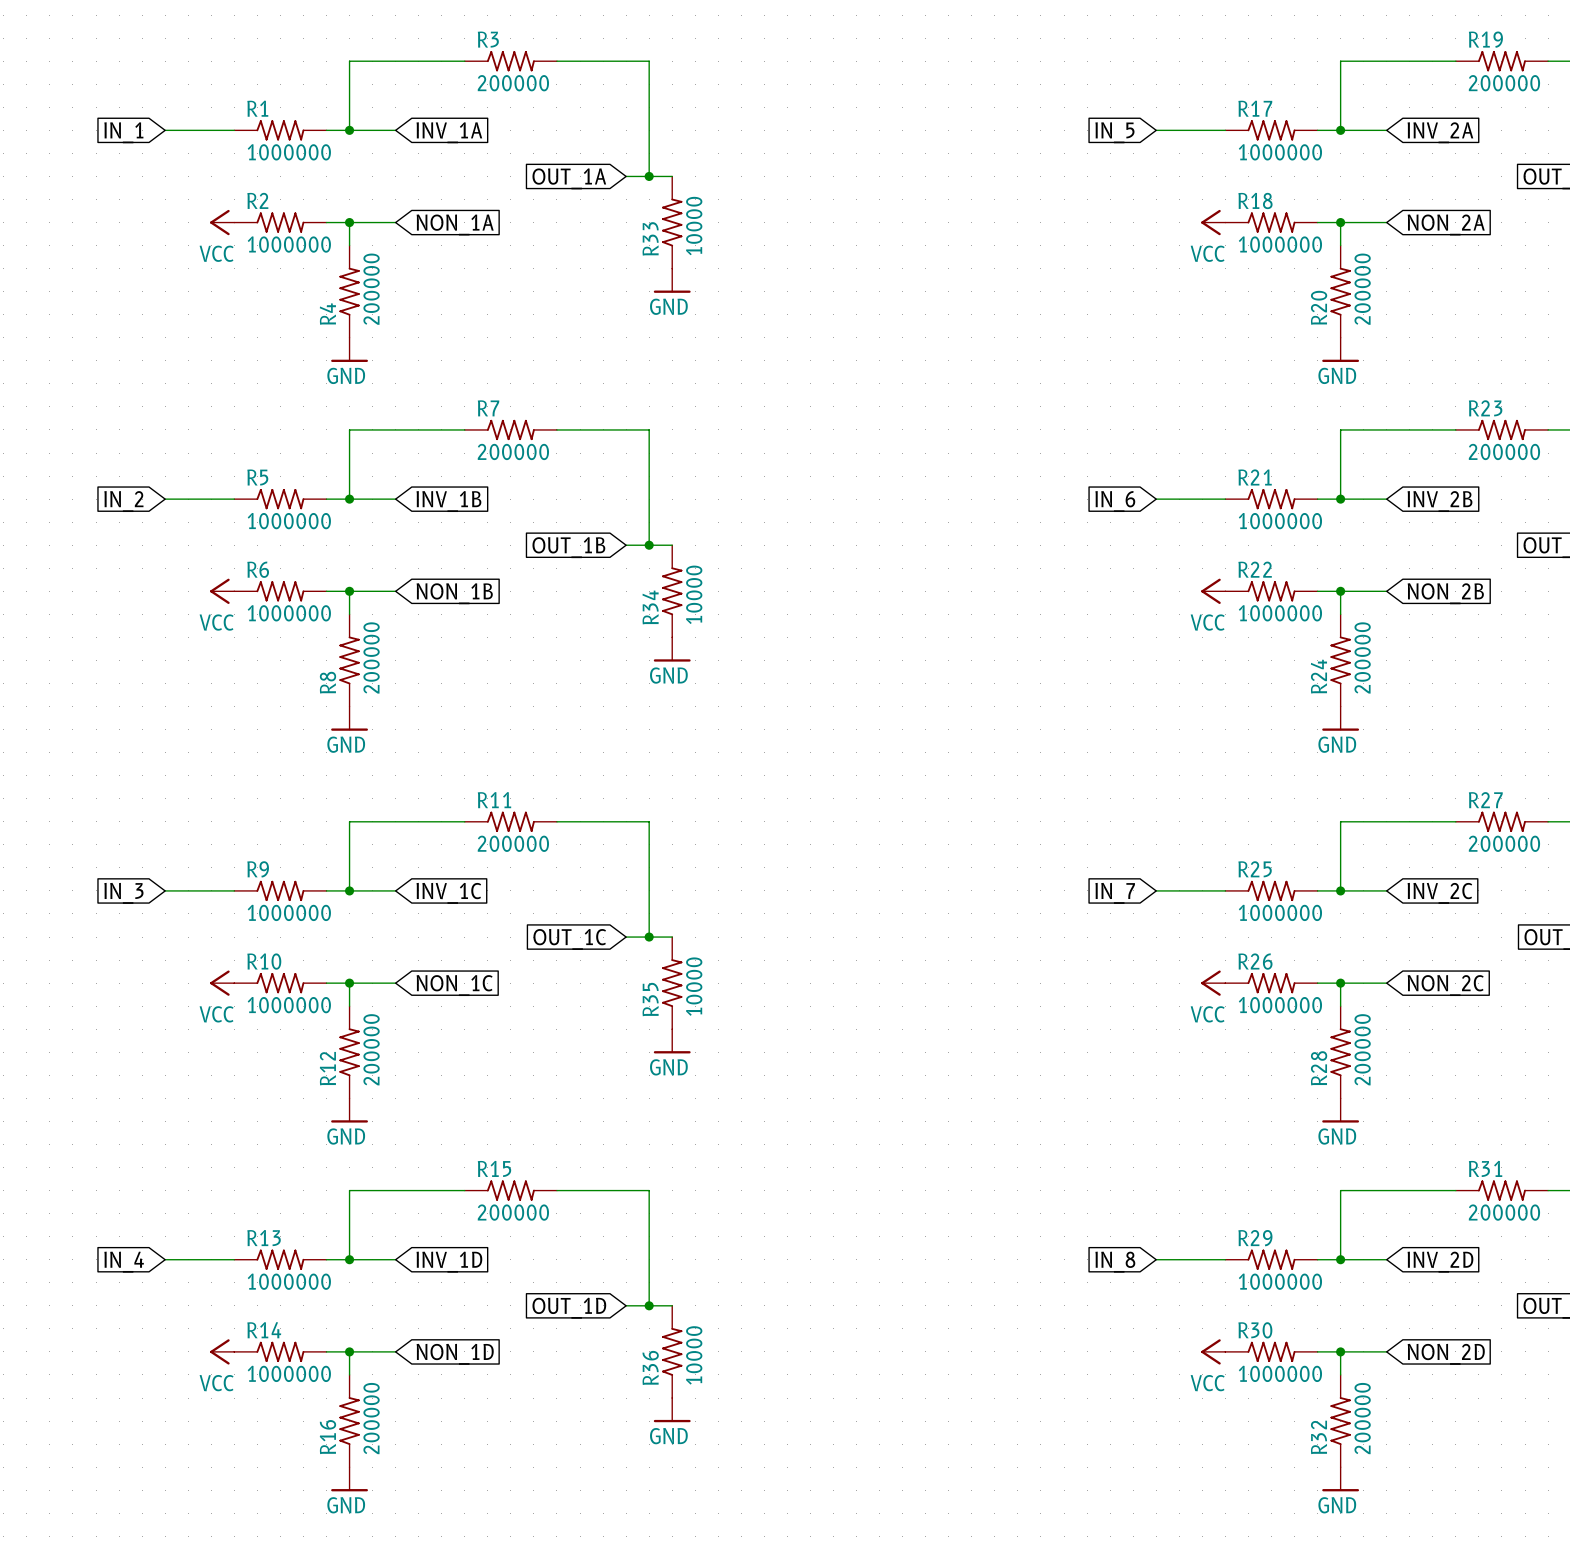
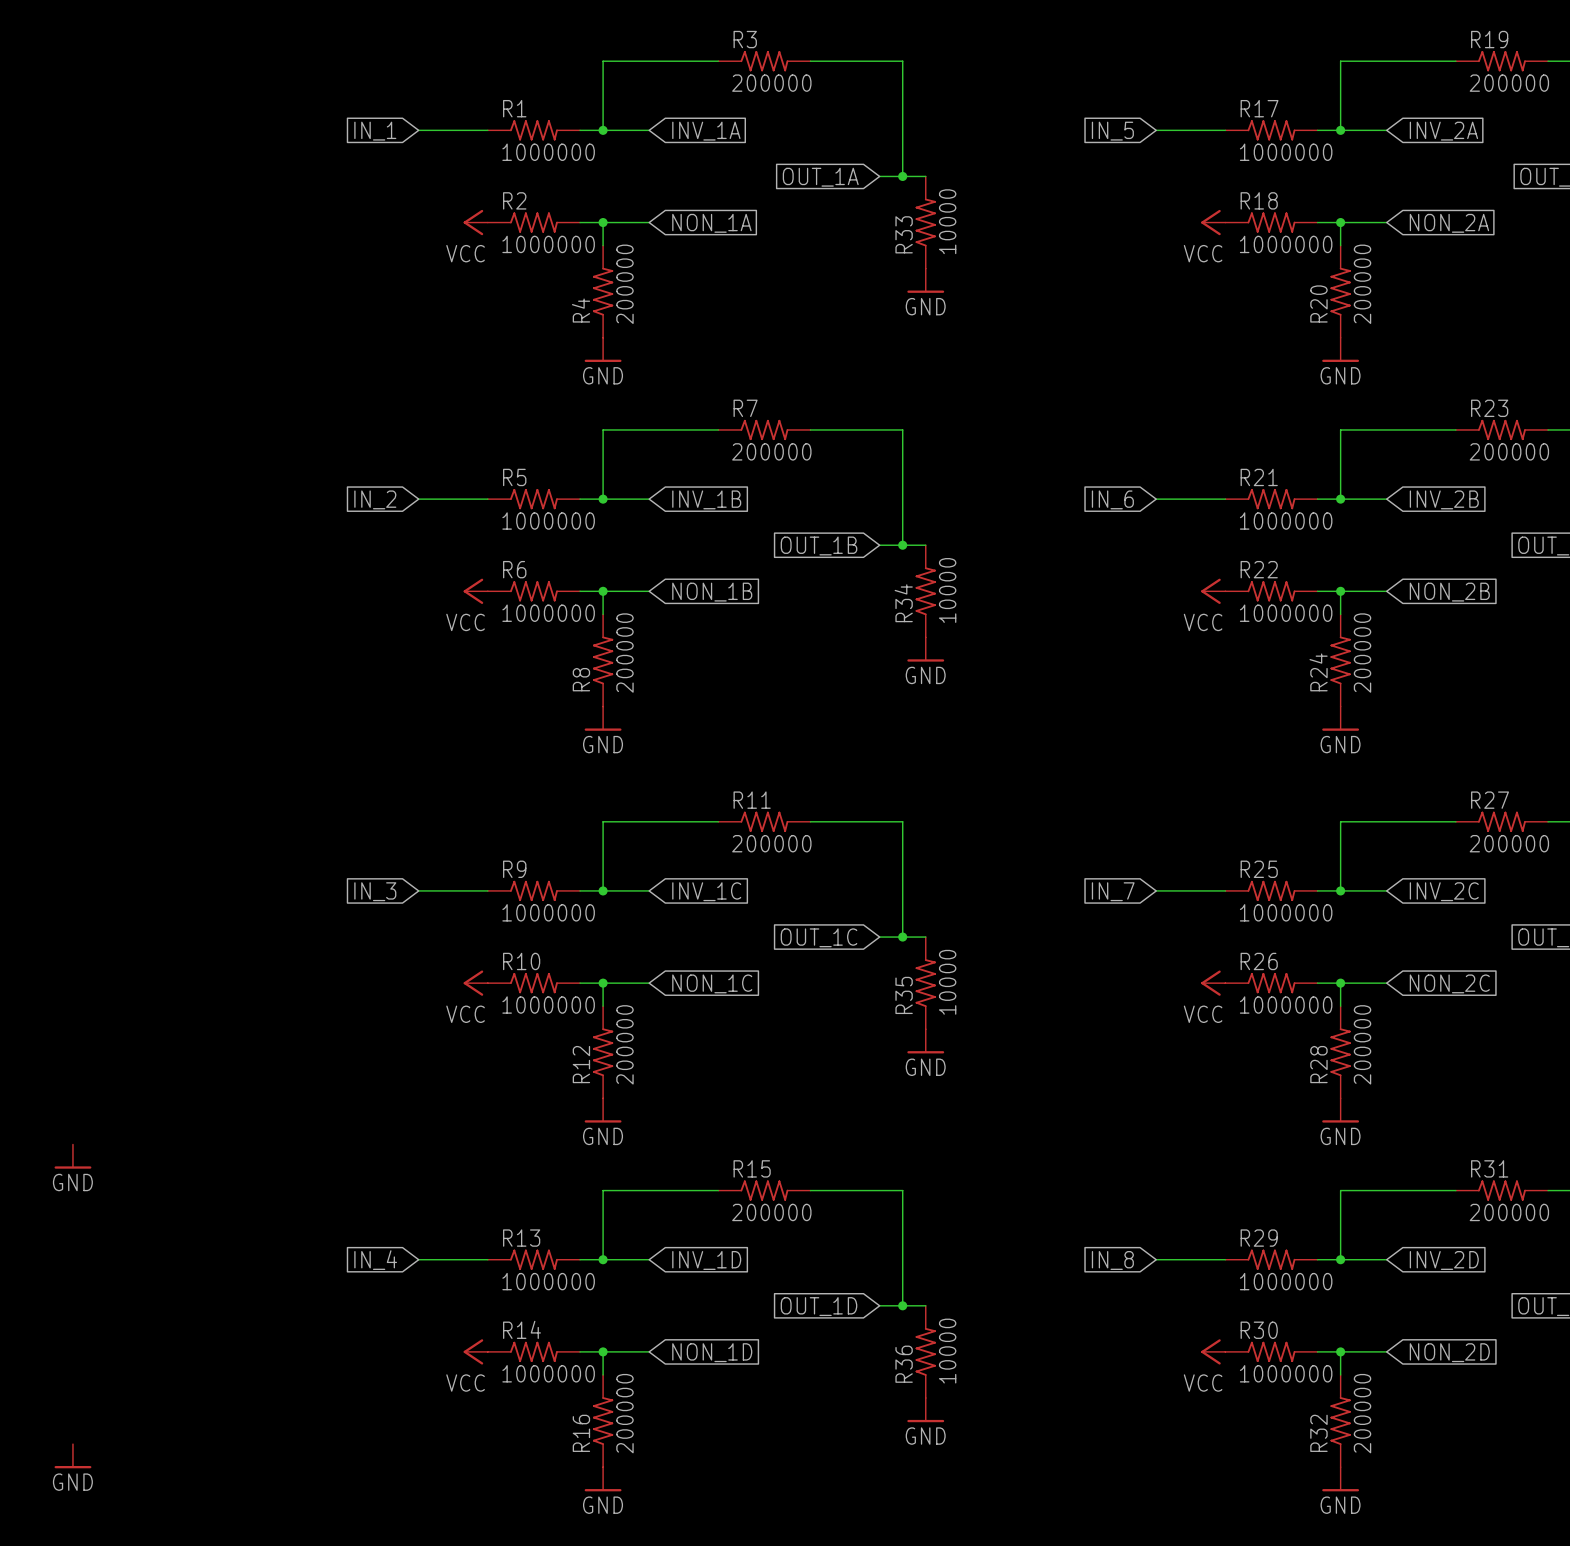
wire: (464, 61) (349, 61) (349, 130) -> none
R3 position: (510, 61) -> (764, 61)
wire: (556, 61) (603, 61) -> (603, 130) (603, 61)
wire: (649, 61) (649, 176) -> (649, 61) (718, 61)
wire: none -> (810, 61) (902, 61) (902, 176)
wire: (165, 130) (234, 130) -> none
R1 position: (280, 130) -> (533, 130)
wire: (326, 130) (395, 130) -> (418, 130) (487, 130)
junction: (349, 130) -> none
wire: none -> (580, 130) (649, 130)
junction: none -> (603, 130)
global label: IN_1 (123, 132) -> none
global label: INV_1A (449, 132) -> IN_1 (375, 131)
global label: none -> INV_1A (706, 131)
wire: (626, 176) (672, 176) -> none
junction: (649, 176) -> none
wire: none -> (879, 176) (925, 176)
junction: none -> (902, 176)
global label: OUT_1A (569, 178) -> none
global label: none -> OUT_1A (820, 177)
power symbol: VCC (222, 222) -> none
R2 position: (280, 222) -> (533, 222)
wire: (326, 222) (395, 222) -> none
wire: (349, 222) (349, 245) -> none
junction: (349, 222) -> none
power symbol: none -> VCC (475, 222)
wire: none -> (580, 222) (649, 222)
wire: none -> (603, 222) (603, 245)
junction: none -> (603, 222)
R33 position: (672, 222) -> (925, 222)
global label: NON_1A (455, 224) -> none
global label: none -> NON_1A (711, 223)
power symbol position: GND (672, 280) -> GND (603, 349)
power symbol: none -> GND (925, 280)
R4 position: (349, 291) -> (603, 291)
power symbol: GND (349, 349) -> none
wire: (464, 429) (349, 429) (349, 499) -> none
R7 position: (510, 429) -> (764, 429)
wire: (556, 429) (603, 429) -> (603, 499) (603, 429)
wire: (649, 429) (649, 545) -> (649, 429) (718, 429)
wire: none -> (810, 429) (902, 429) (902, 545)
wire: (165, 499) (234, 499) -> none
R5 position: (280, 499) -> (533, 499)
wire: (326, 499) (395, 499) -> (418, 499) (487, 499)
junction: (349, 499) -> none
wire: none -> (580, 499) (649, 499)
junction: none -> (603, 499)
global label: IN_2 (123, 501) -> none
global label: none -> IN_2 (375, 499)
global label: INV_1B (448, 501) -> none
global label: none -> INV_1B (706, 499)
wire: (626, 545) (672, 545) -> none
junction: (649, 545) -> none
wire: none -> (879, 545) (925, 545)
junction: none -> (902, 545)
global label: OUT_1B (568, 547) -> none
global label: none -> OUT_1B (819, 545)
power symbol: VCC (222, 591) -> none
R6 position: (280, 591) -> (533, 591)
wire: (326, 591) (395, 591) -> none
wire: (349, 591) (349, 614) -> none
junction: (349, 591) -> none
power symbol: none -> VCC (475, 591)
wire: none -> (580, 591) (649, 591)
wire: none -> (603, 591) (603, 614)
junction: none -> (603, 591)
R34 position: (672, 591) -> (925, 591)
global label: NON_1B (454, 593) -> none
global label: none -> NON_1B (712, 592)
power symbol position: GND (672, 649) -> GND (603, 718)
power symbol: none -> GND (925, 649)
R8 position: (349, 660) -> (603, 660)
power symbol: GND (349, 718) -> none
wire: (464, 821) (349, 821) (349, 890) -> none
R11 position: (510, 821) -> (764, 821)
wire: (556, 821) (603, 821) -> (603, 890) (603, 821)
wire: (649, 821) (649, 937) -> (649, 821) (718, 821)
wire: none -> (810, 821) (902, 821) (902, 937)
wire: (165, 890) (234, 890) -> none
R9 position: (280, 890) -> (533, 890)
wire: (326, 890) (395, 890) -> (418, 890) (487, 890)
junction: (349, 890) -> none
wire: none -> (580, 890) (649, 890)
junction: none -> (603, 890)
global label: IN_3 (123, 893) -> none
global label: none -> IN_3 (375, 891)
global label: INV_1C (448, 893) -> none
global label: none -> INV_1C (706, 891)
wire: (626, 937) (672, 937) -> none
junction: (649, 937) -> none
wire: none -> (879, 937) (925, 937)
junction: none -> (902, 937)
global label: OUT_1C (569, 939) -> none
global label: none -> OUT_1C (819, 937)
power symbol: VCC (222, 983) -> none
R10 position: (280, 983) -> (533, 983)
wire: (326, 983) (395, 983) -> none
wire: (349, 983) (349, 1006) -> none
junction: (349, 983) -> none
power symbol: none -> VCC (475, 983)
wire: none -> (580, 983) (649, 983)
wire: none -> (603, 983) (603, 1006)
junction: none -> (603, 983)
R35 position: (672, 983) -> (925, 983)
global label: NON_1C (454, 985) -> none
global label: none -> NON_1C (712, 983)
power symbol position: GND (672, 1041) -> GND (603, 1110)
power symbol: none -> GND (925, 1041)
R12 position: (349, 1052) -> (603, 1052)
power symbol: GND (349, 1110) -> none
power symbol: none -> GND (72, 1156)
wire: (464, 1190) (349, 1190) (349, 1259) -> none
R15 position: (510, 1190) -> (764, 1190)
wire: (556, 1190) (603, 1190) -> (603, 1259) (603, 1190)
wire: (649, 1190) (649, 1305) -> (649, 1190) (718, 1190)
wire: none -> (810, 1190) (902, 1190) (902, 1305)
wire: (165, 1259) (234, 1259) -> none
R13 position: (280, 1259) -> (533, 1259)
wire: (326, 1259) (395, 1259) -> (418, 1259) (487, 1259)
junction: (349, 1259) -> none
wire: none -> (580, 1259) (649, 1259)
junction: none -> (603, 1259)
global label: IN_4 (124, 1262) -> none
global label: none -> IN_4 (375, 1260)
global label: INV_1D (449, 1262) -> none
global label: none -> INV_1D (706, 1260)
wire: (626, 1305) (672, 1305) -> none
junction: (649, 1305) -> none
wire: none -> (879, 1305) (925, 1305)
junction: none -> (902, 1305)
global label: OUT_1D (569, 1308) -> none
global label: none -> OUT_1D (819, 1306)
power symbol: VCC (222, 1351) -> none
R14 position: (280, 1351) -> (533, 1351)
wire: (326, 1351) (395, 1351) -> none
wire: (349, 1351) (349, 1374) -> none
junction: (349, 1351) -> none
power symbol: none -> VCC (475, 1351)
wire: none -> (580, 1351) (649, 1351)
wire: none -> (603, 1351) (603, 1374)
junction: none -> (603, 1351)
R36 position: (672, 1351) -> (925, 1351)
global label: NON_1D (455, 1354) -> none
global label: none -> NON_1D (712, 1352)
power symbol position: GND (672, 1410) -> GND (603, 1479)
power symbol: none -> GND (925, 1410)
R16 position: (349, 1421) -> (603, 1421)
power symbol: none -> GND (72, 1456)
power symbol: GND (349, 1479) -> none

